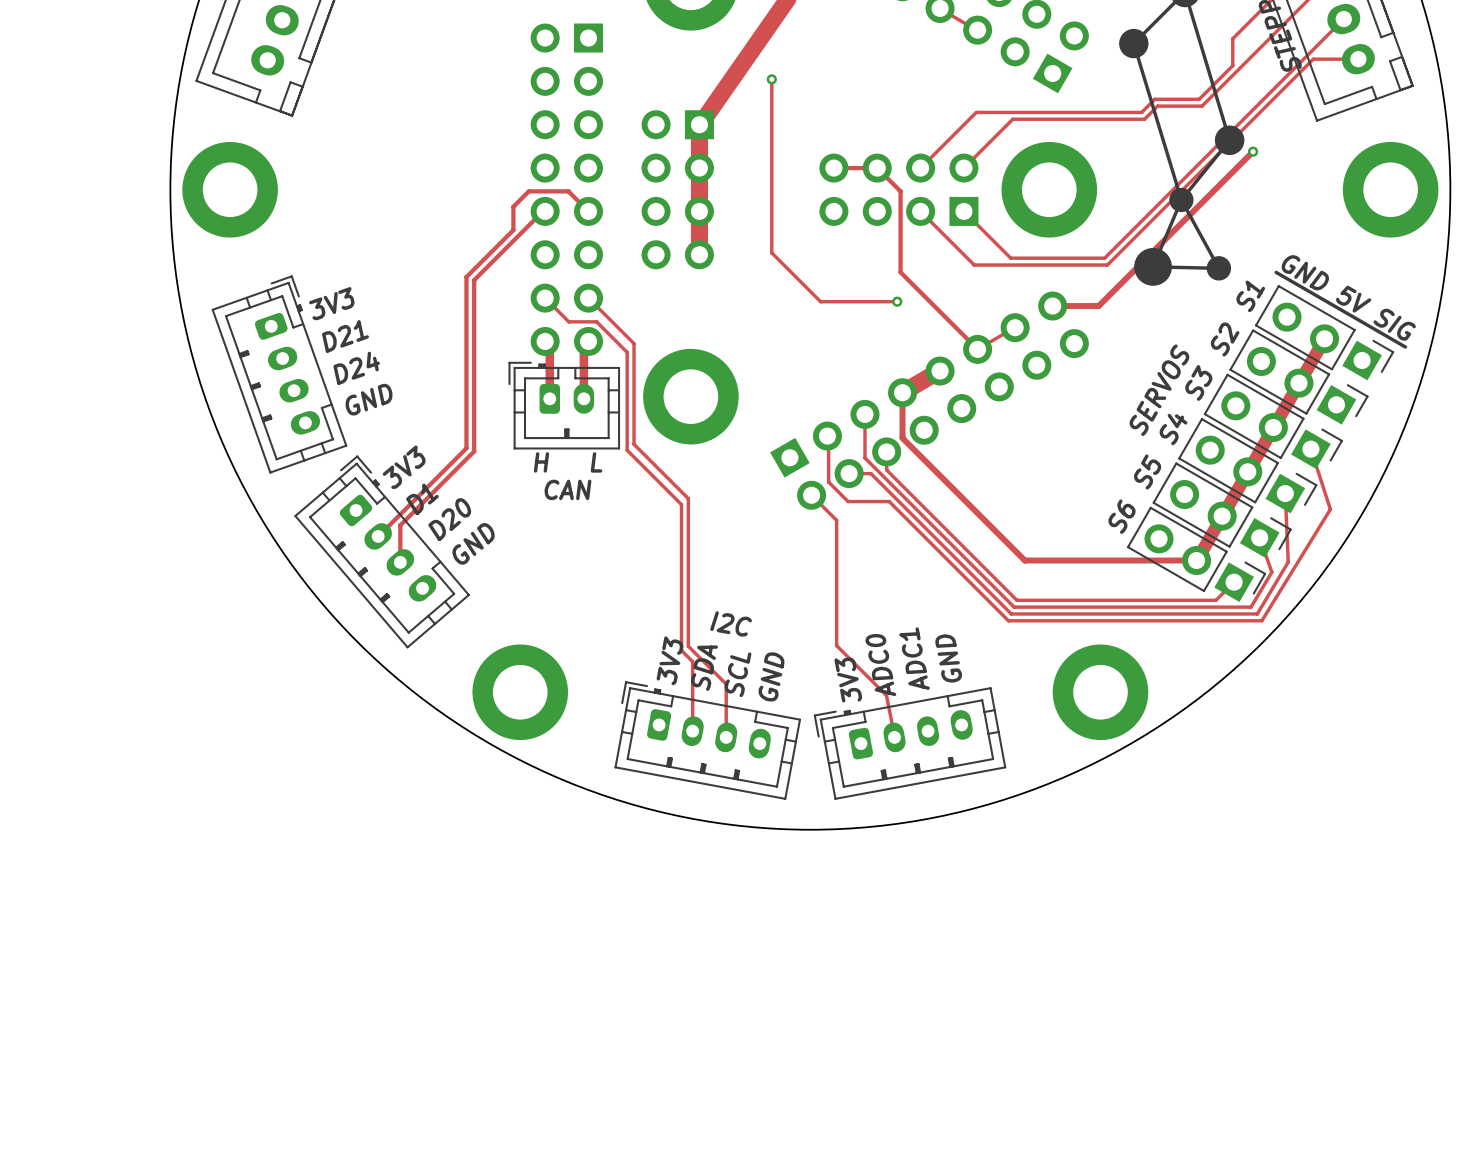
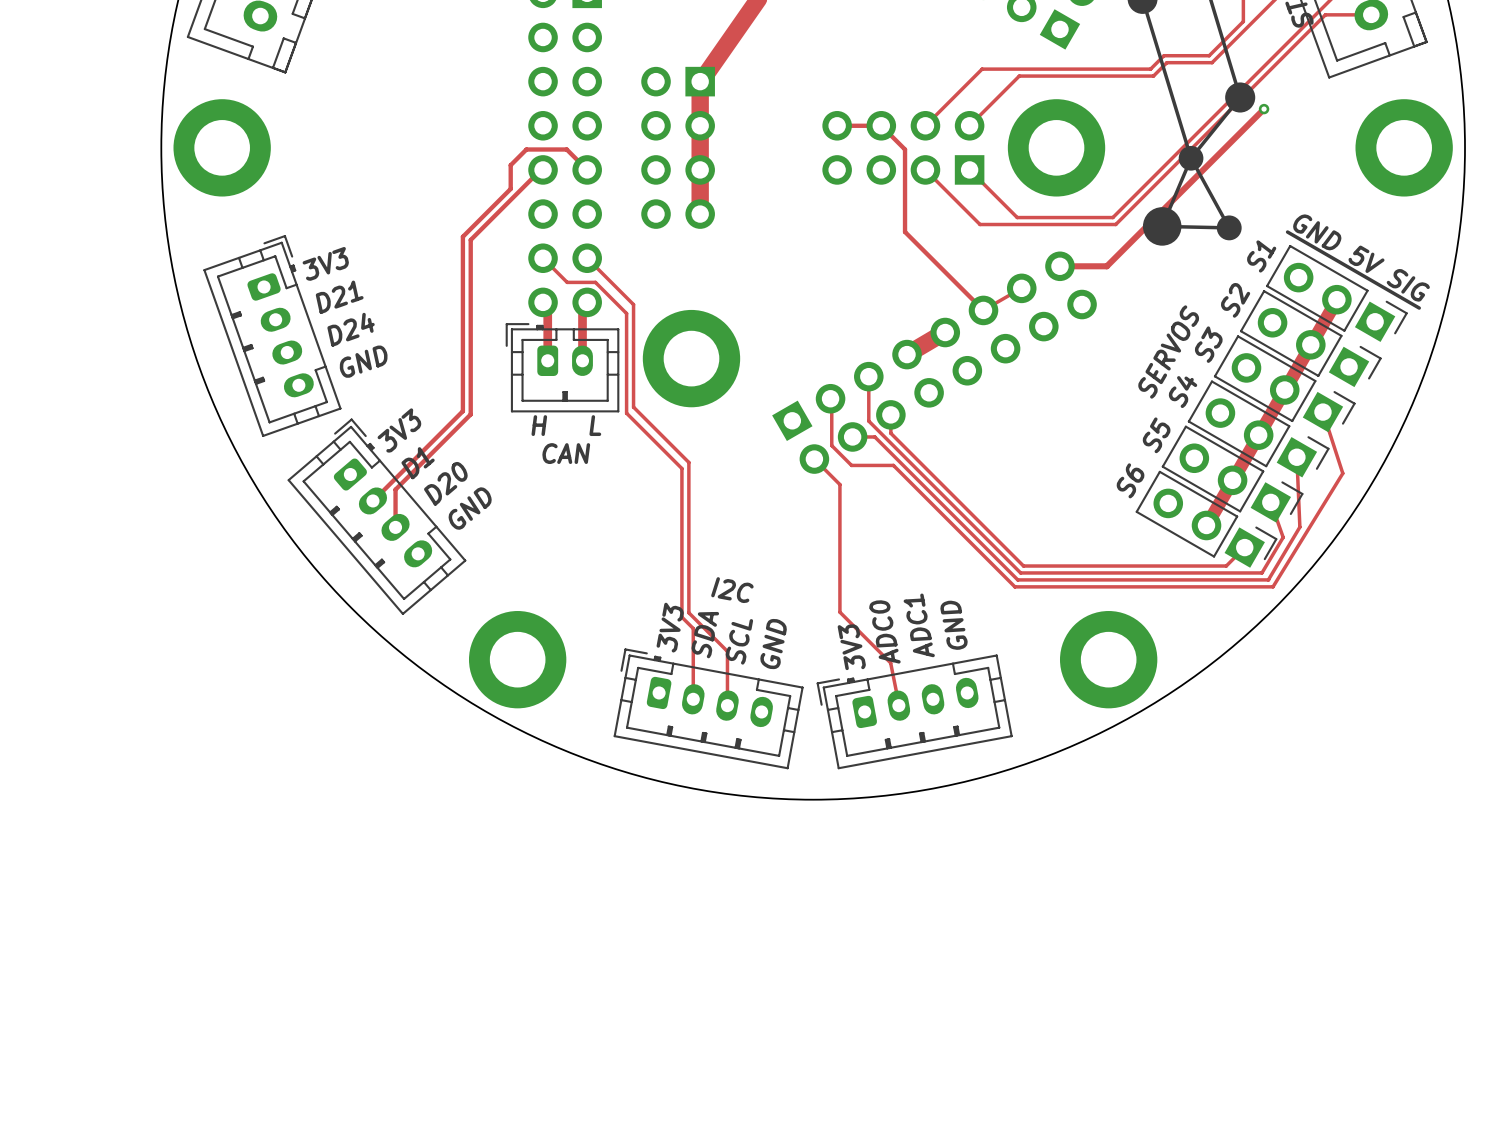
track: (771, 79) (771, 252) (820, 301) (897, 301) -> none
via: (771, 79) -> none
via: (897, 301) -> none
track: (902, 392) (902, 438) (1024, 560) (1196, 560) -> none

